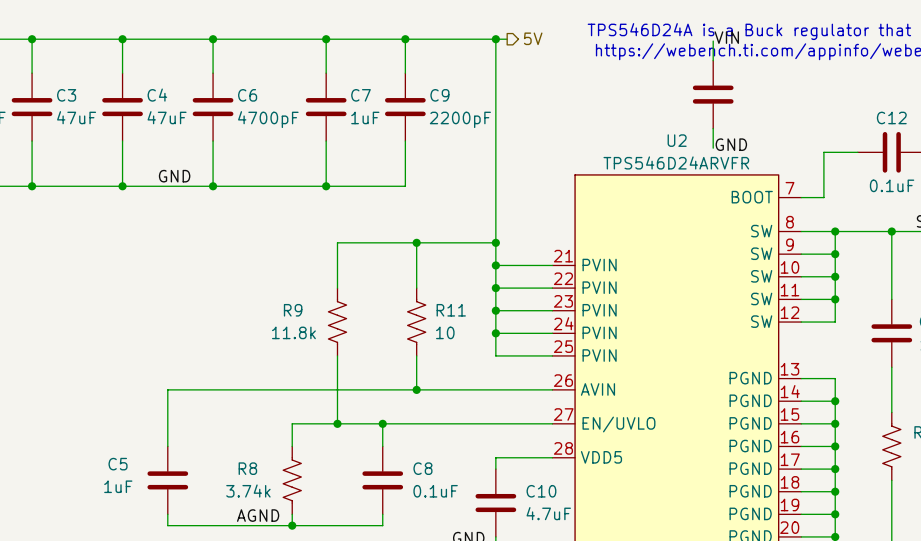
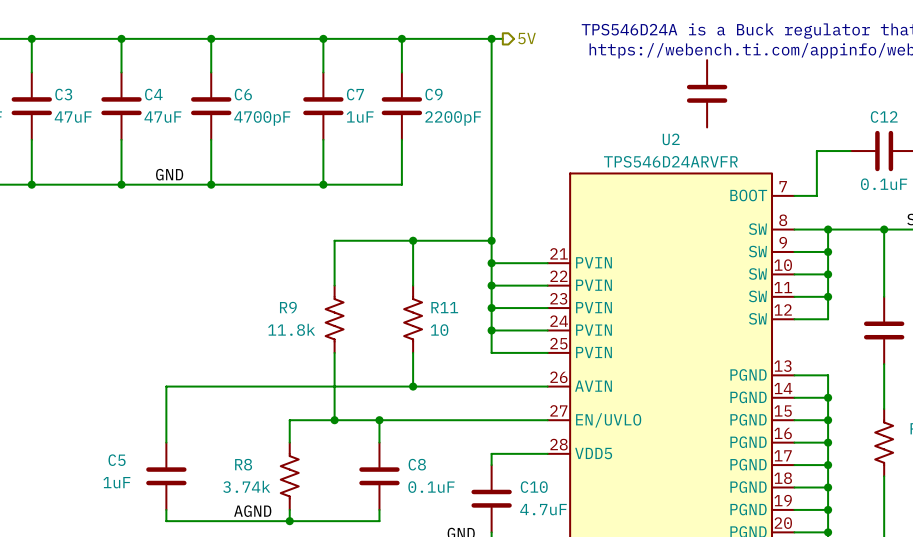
label: VIN (726, 37) -> none
wire: (713, 41) (713, 60) -> none
wire: (713, 128) (713, 148) -> none
label: GND (731, 144) -> none

